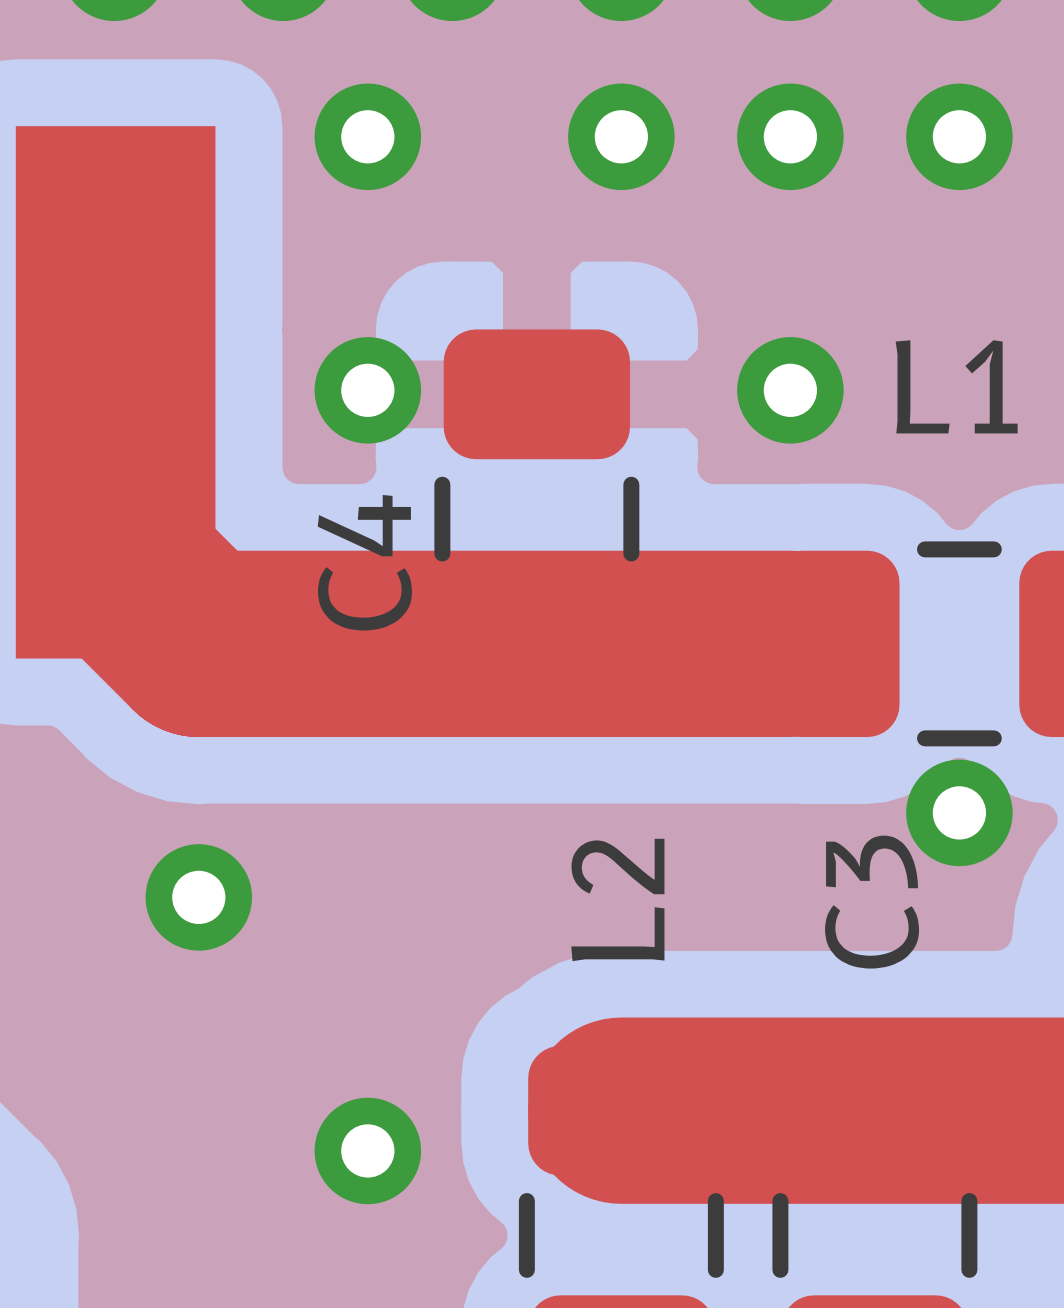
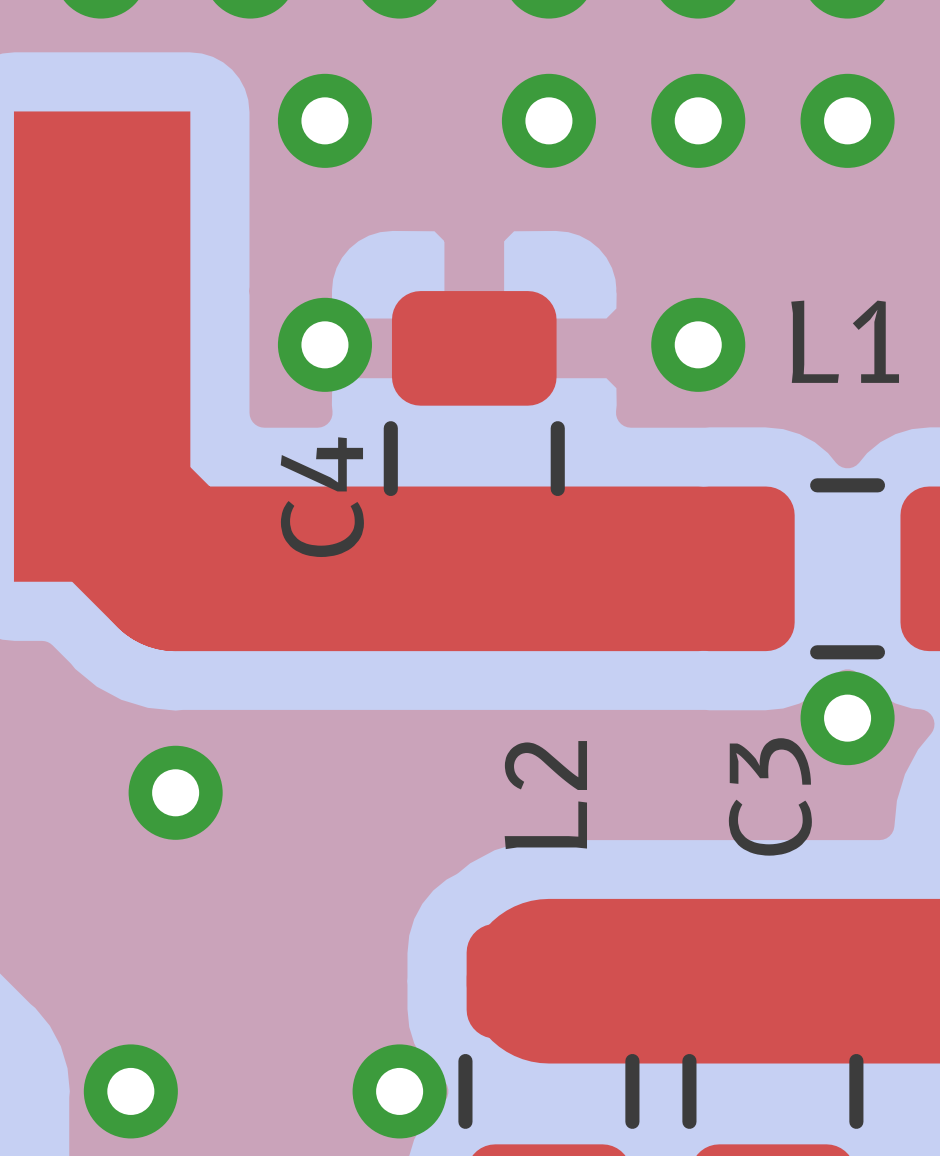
via position: (367, 1150) -> (399, 1091)
via: none -> (130, 1091)

